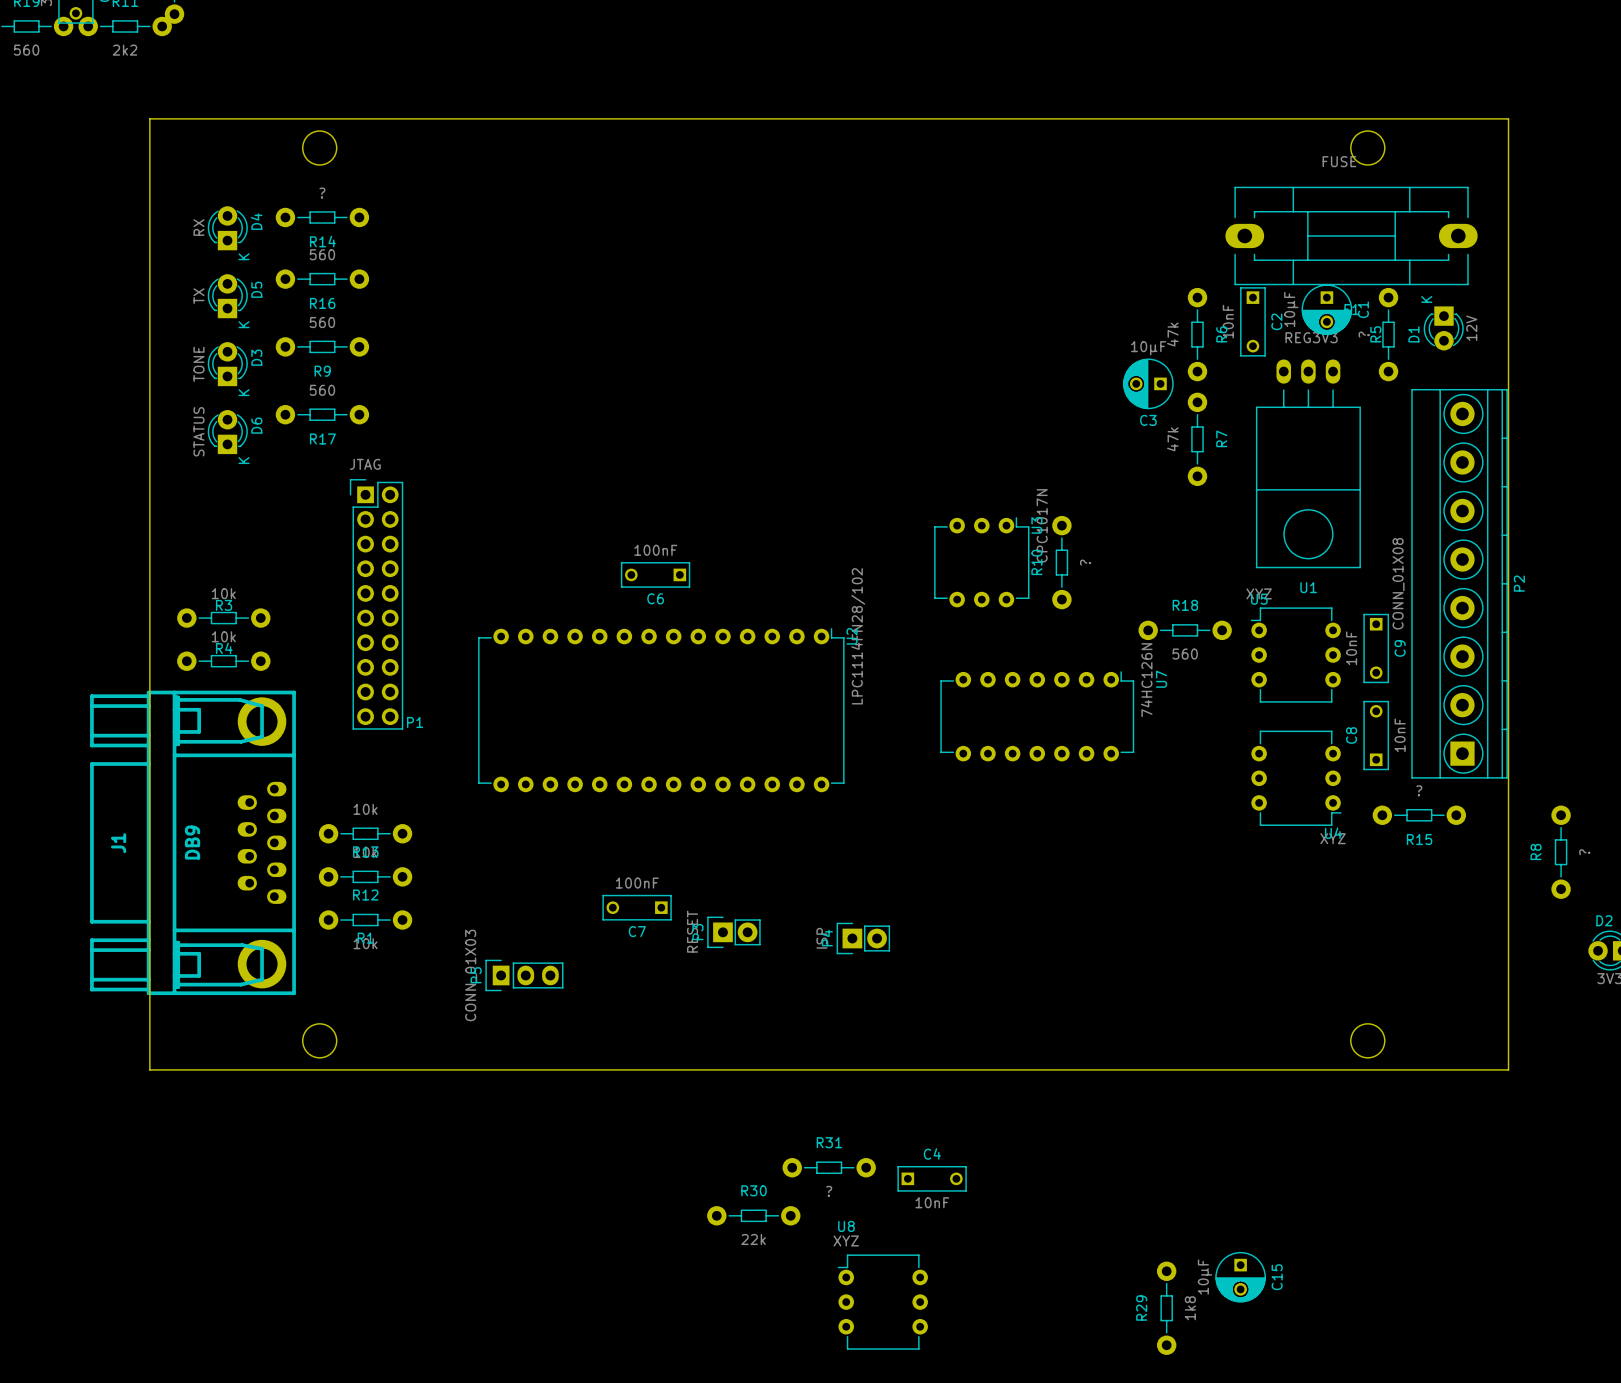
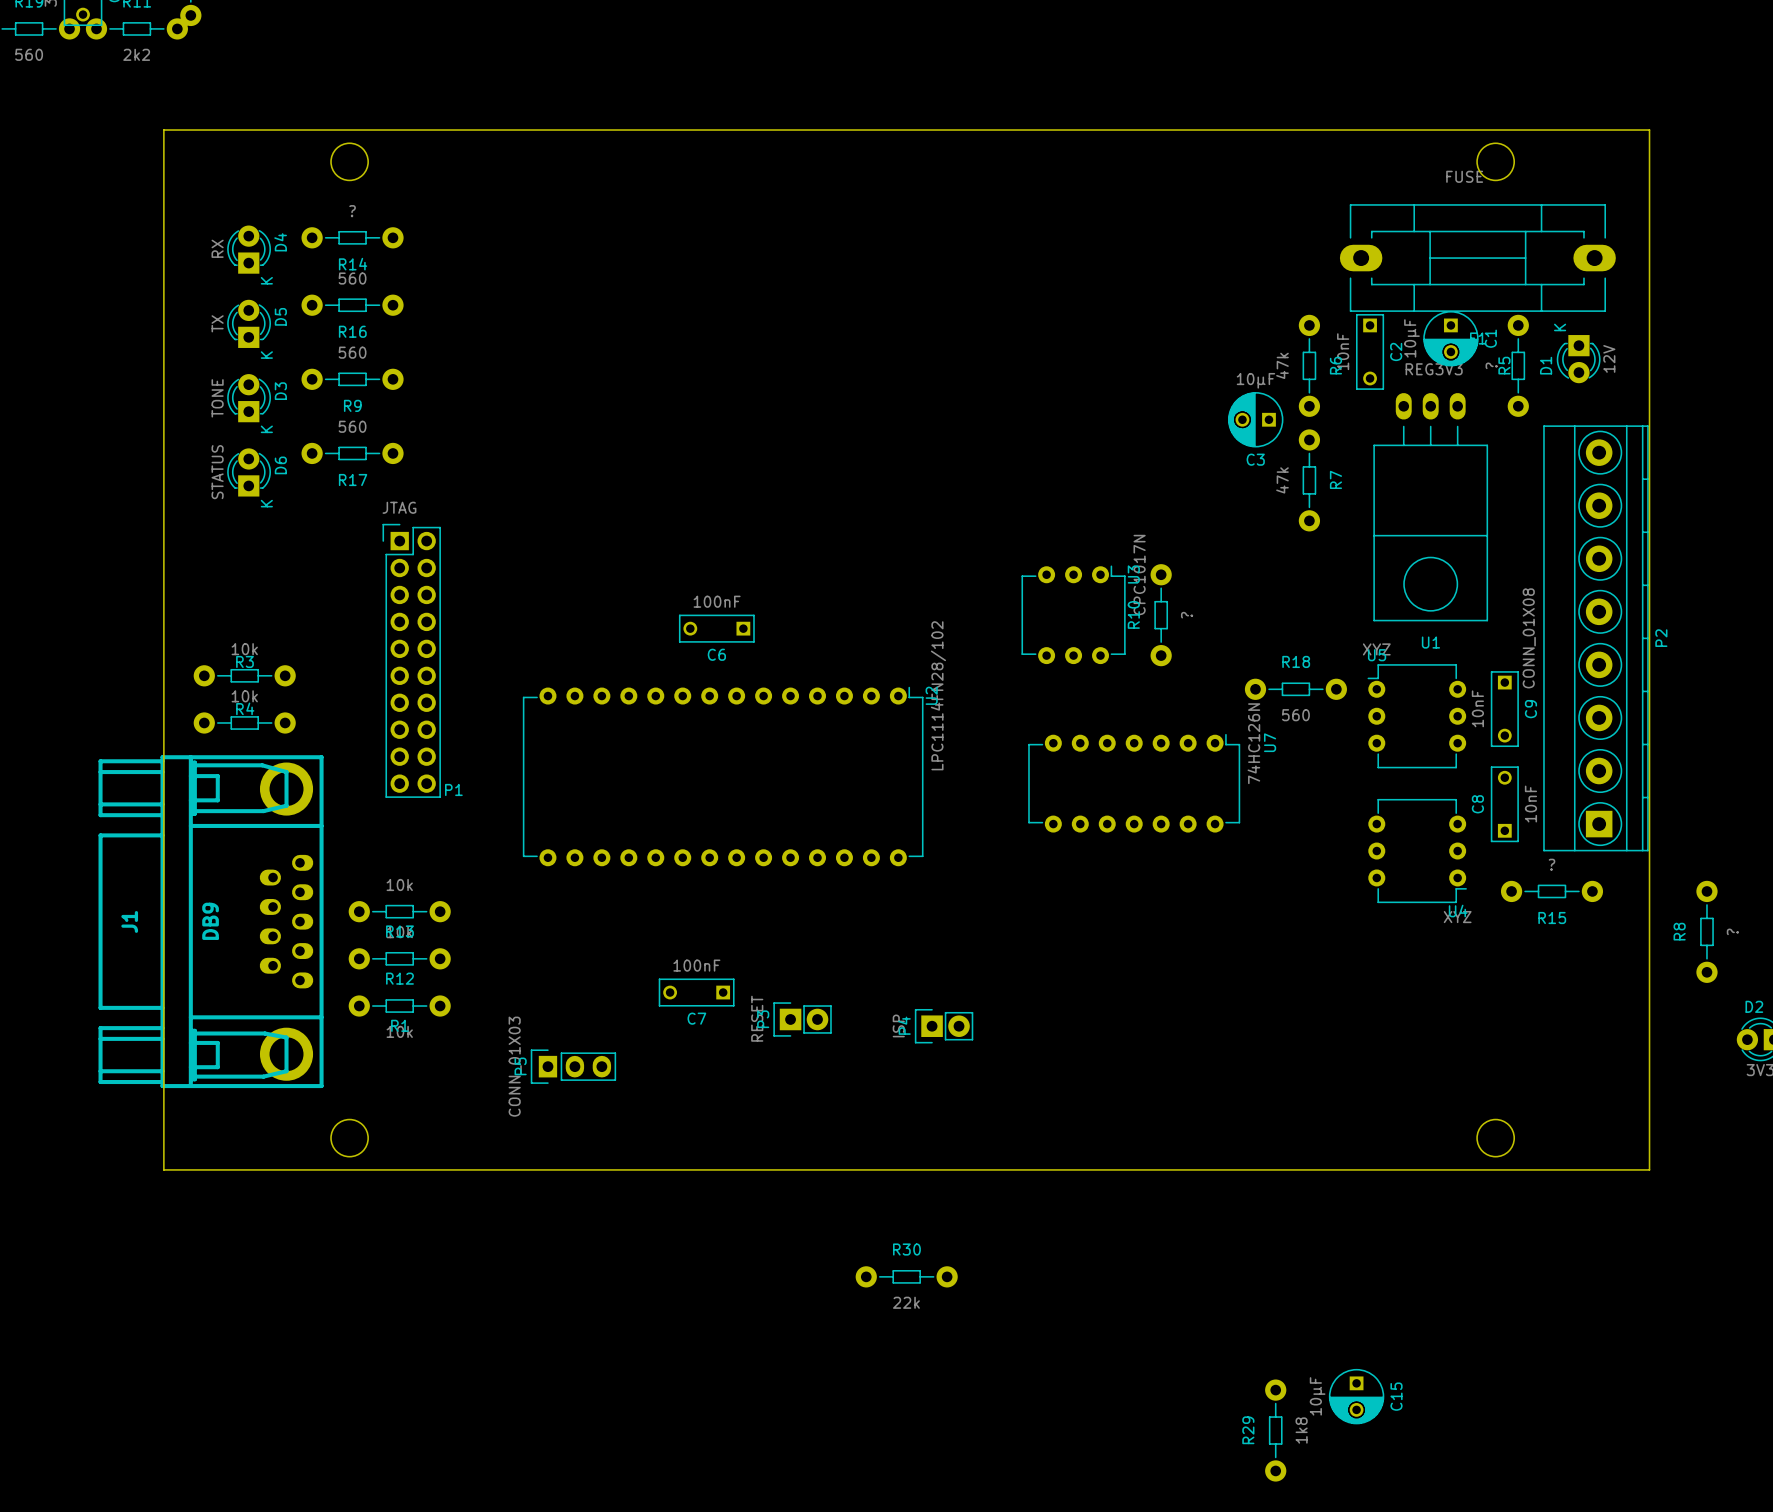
R31 name: R31 (829, 1142) -> R30 (906, 1249)
C4: 10nF (932, 1178) -> none
R31 value: ? (829, 1191) -> 22k (906, 1302)
R30: 22k (753, 1215) -> none
U8: XYZ (882, 1302) -> none

